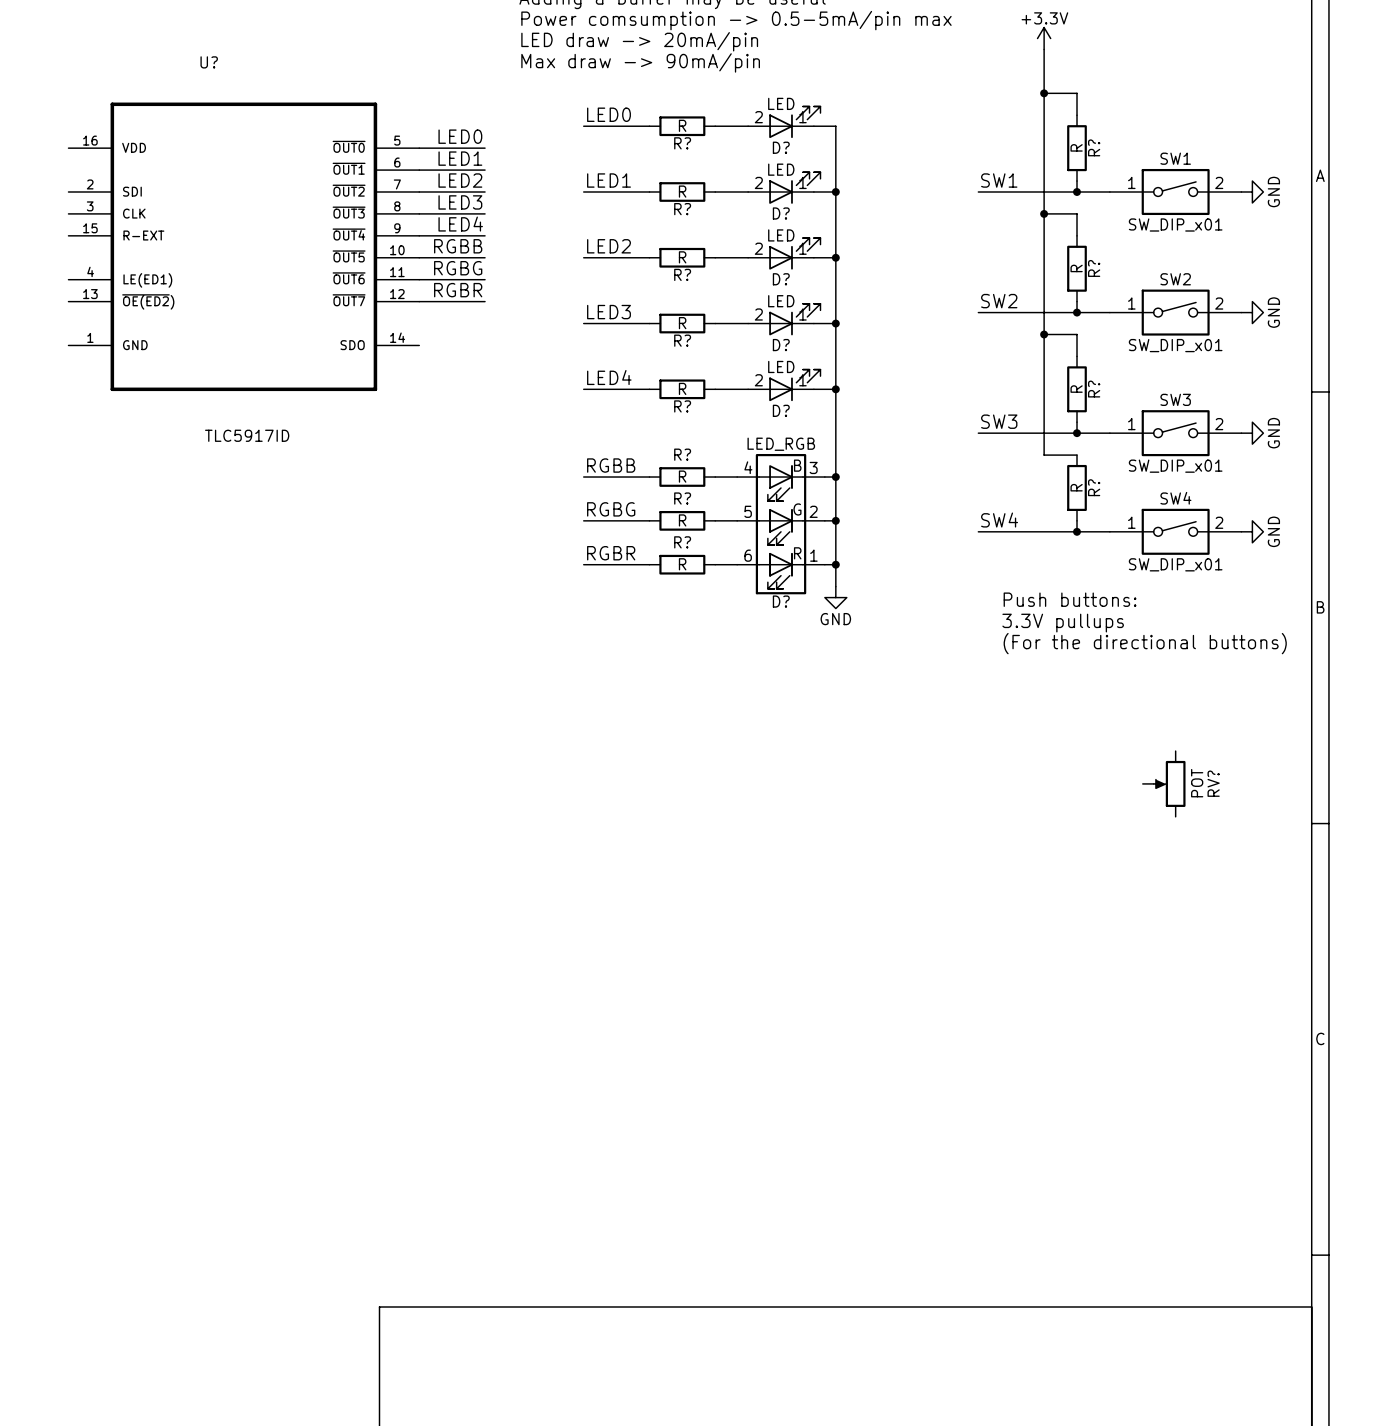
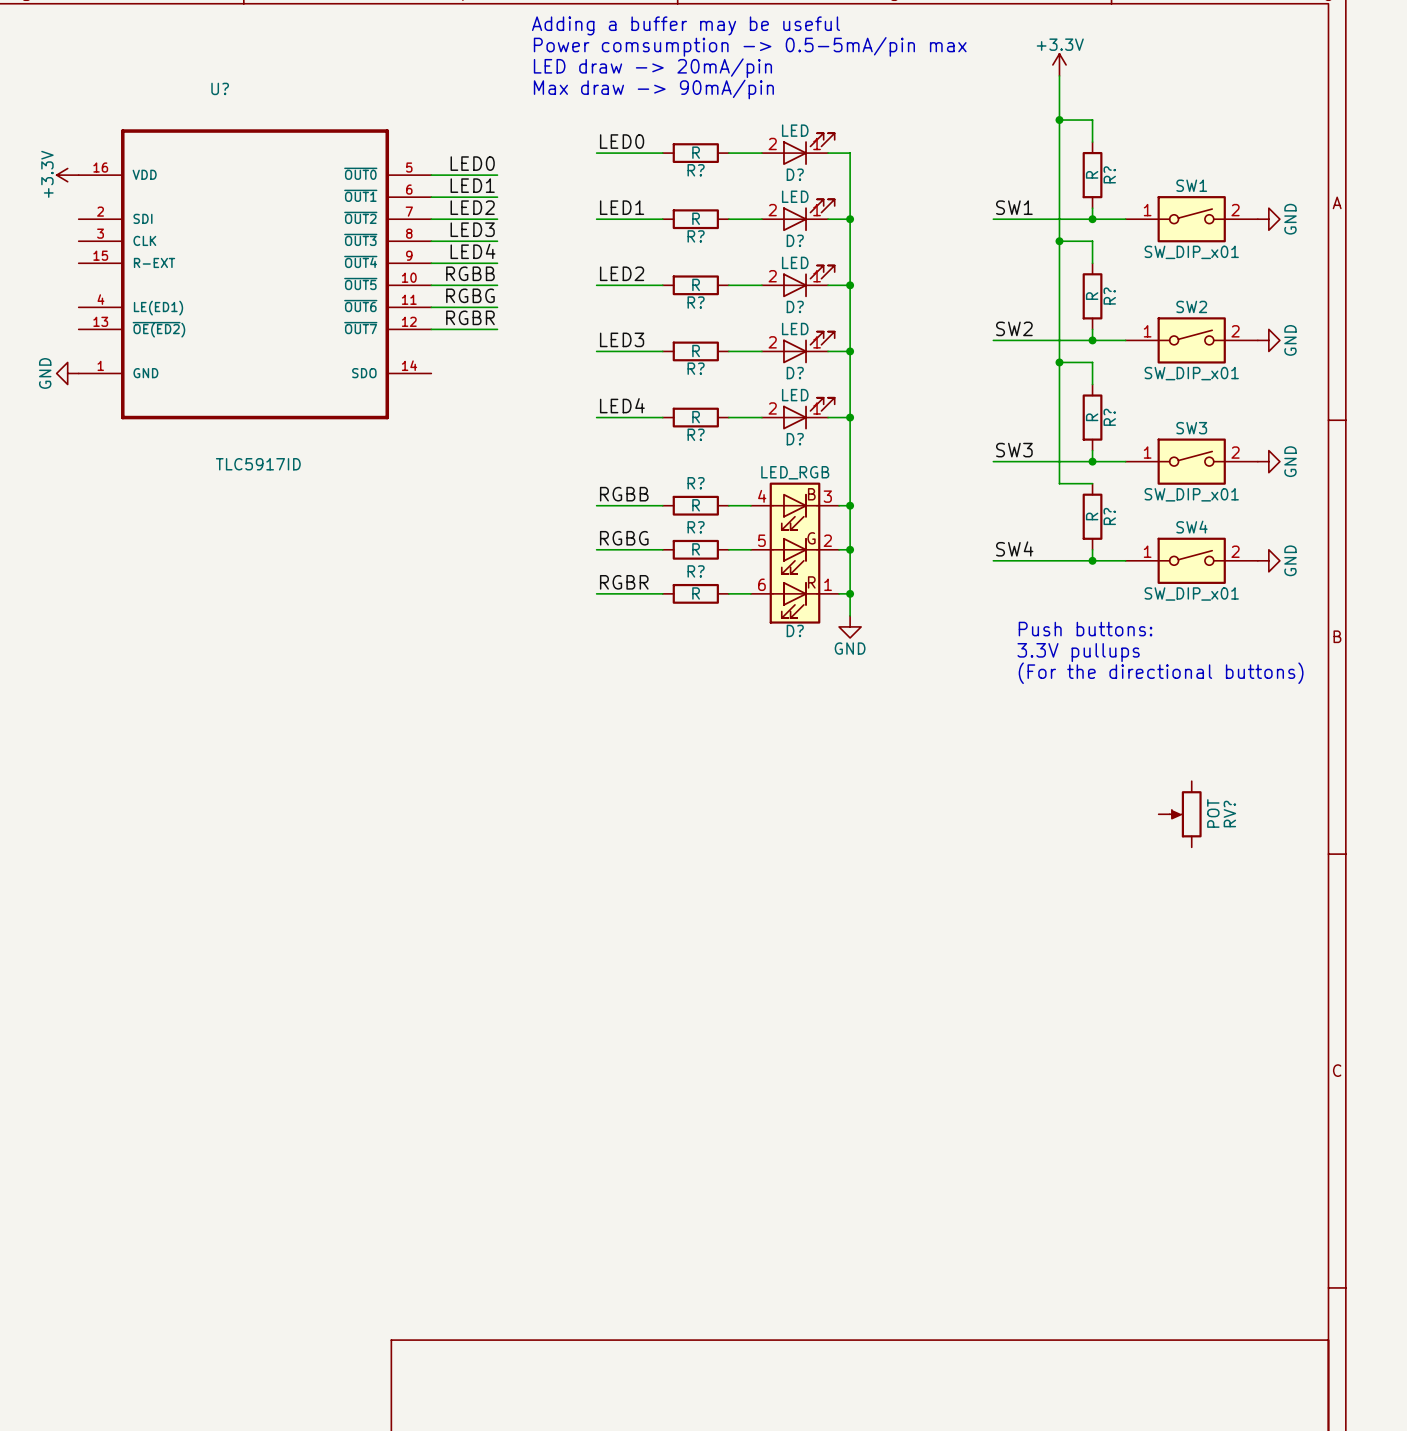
power symbol: none -> +3.3V (67, 175)
power symbol: none -> GND (67, 373)

